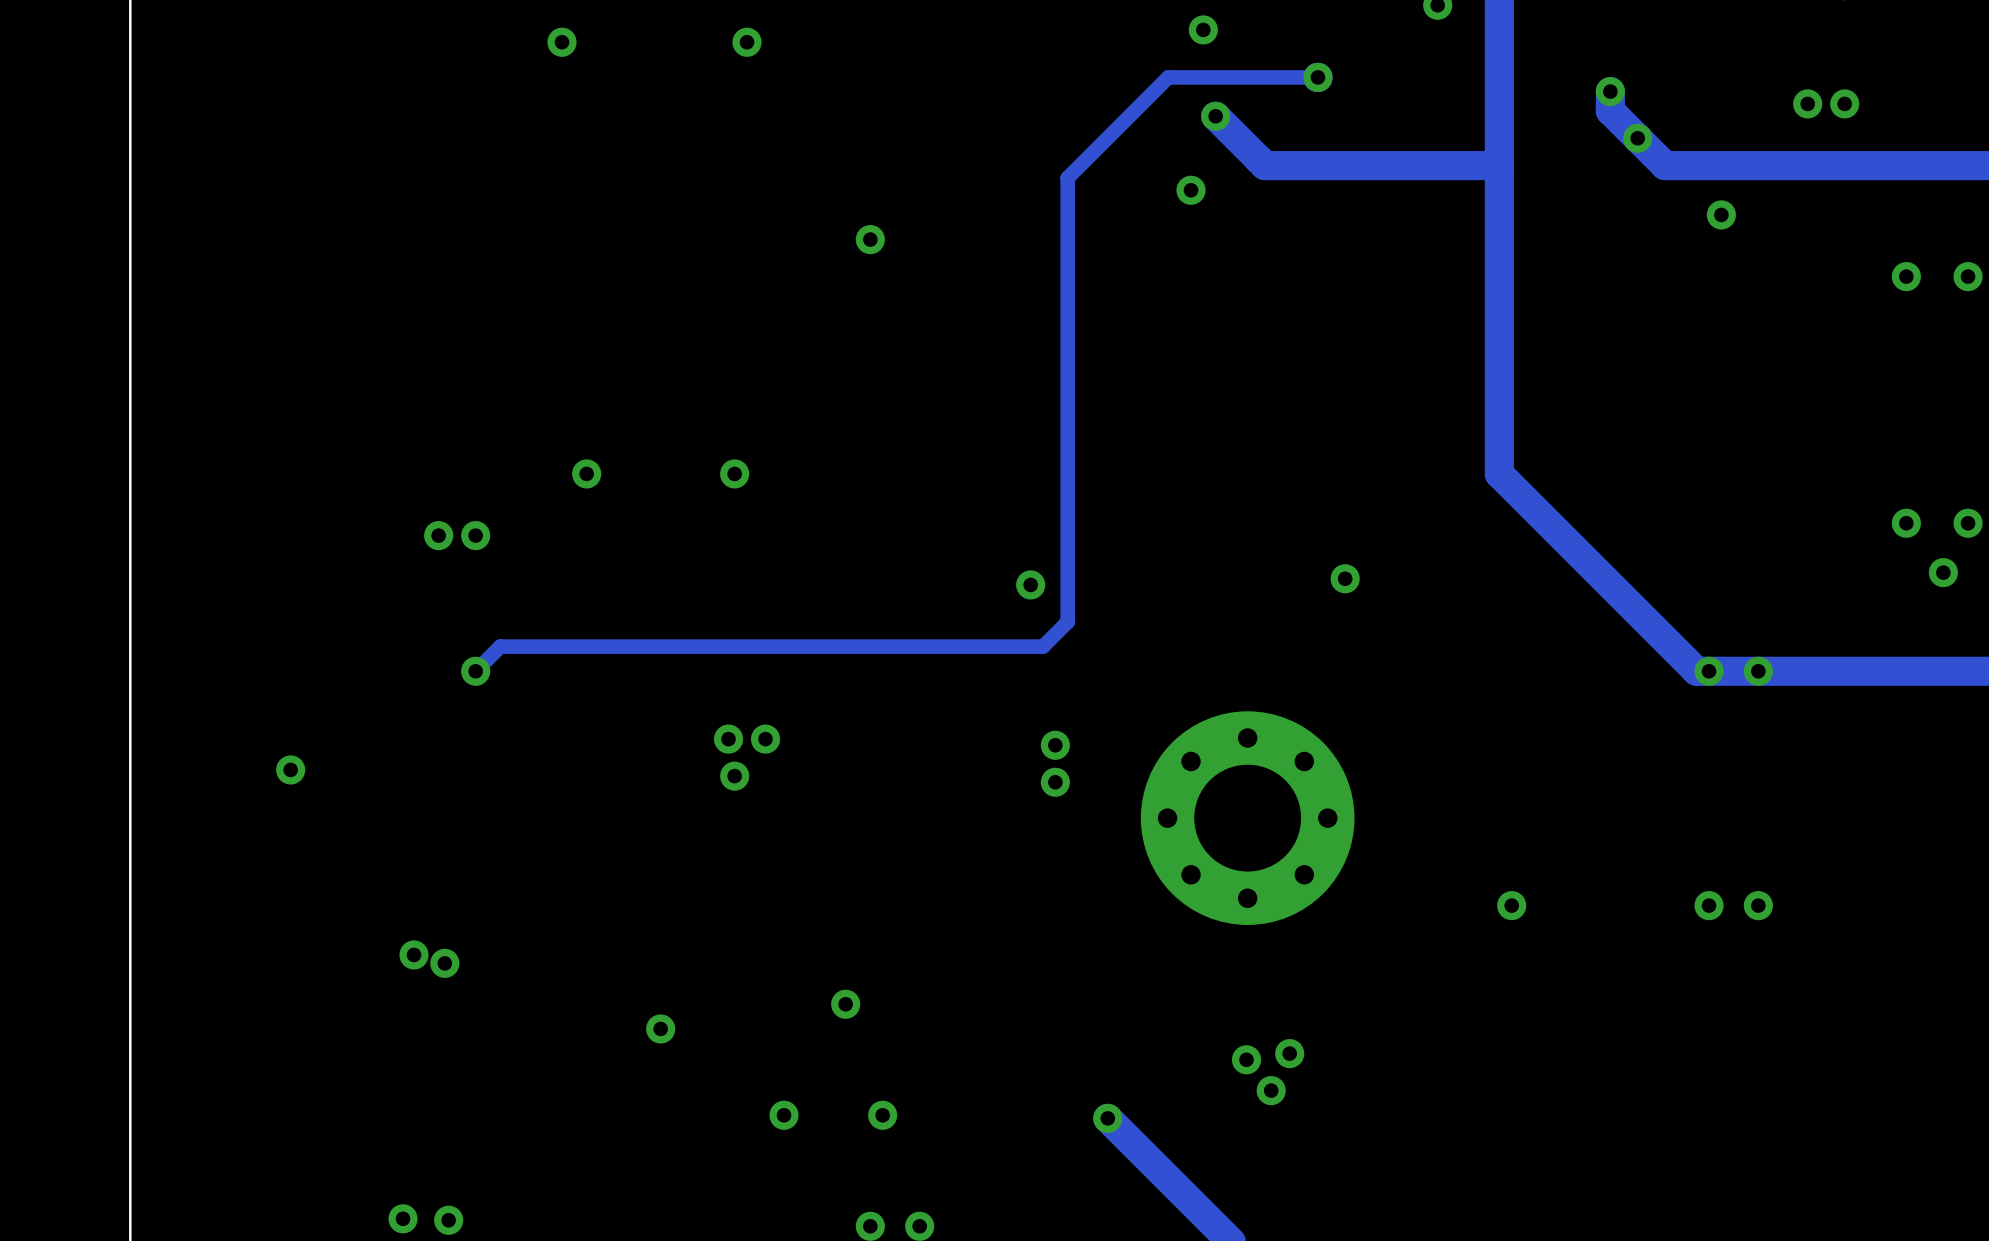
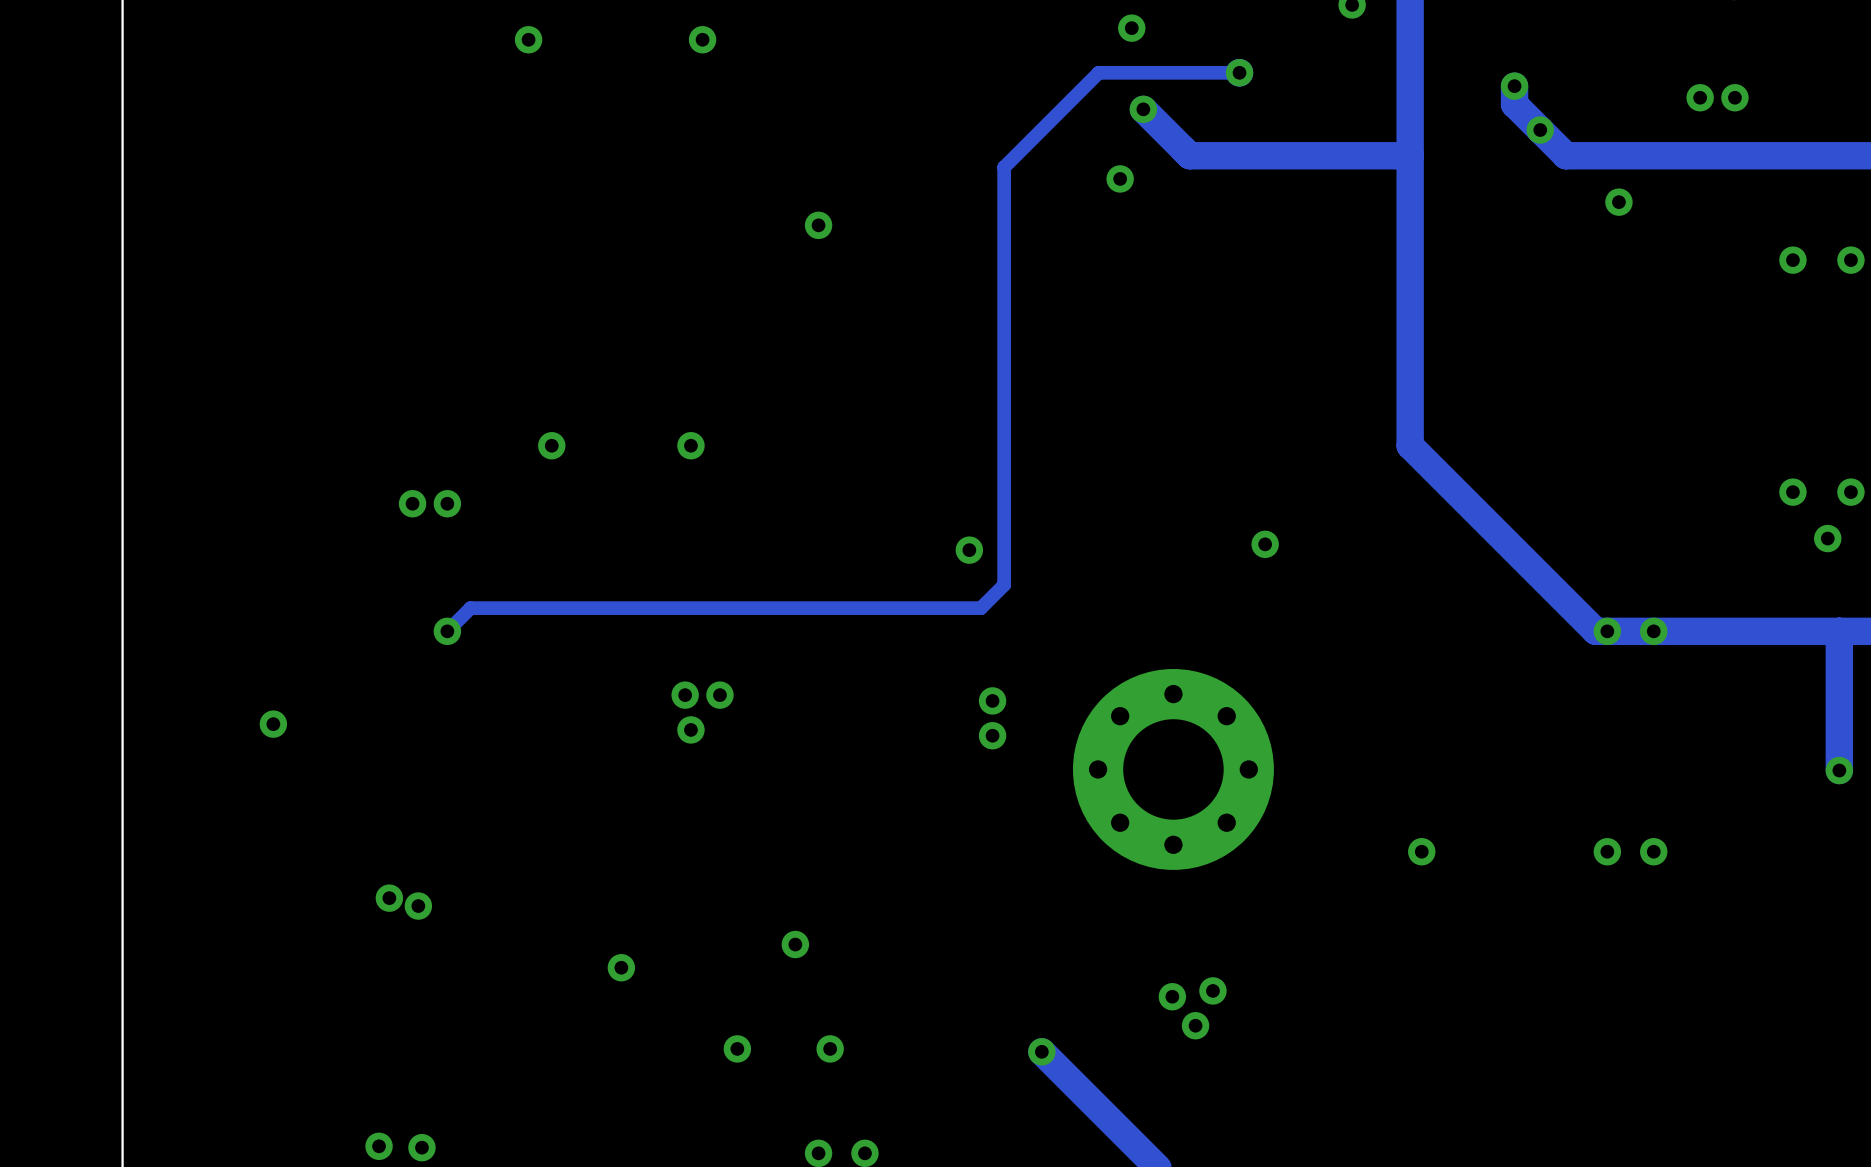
track: none -> (1839, 631) (1839, 770)
via: none -> (1839, 770)

